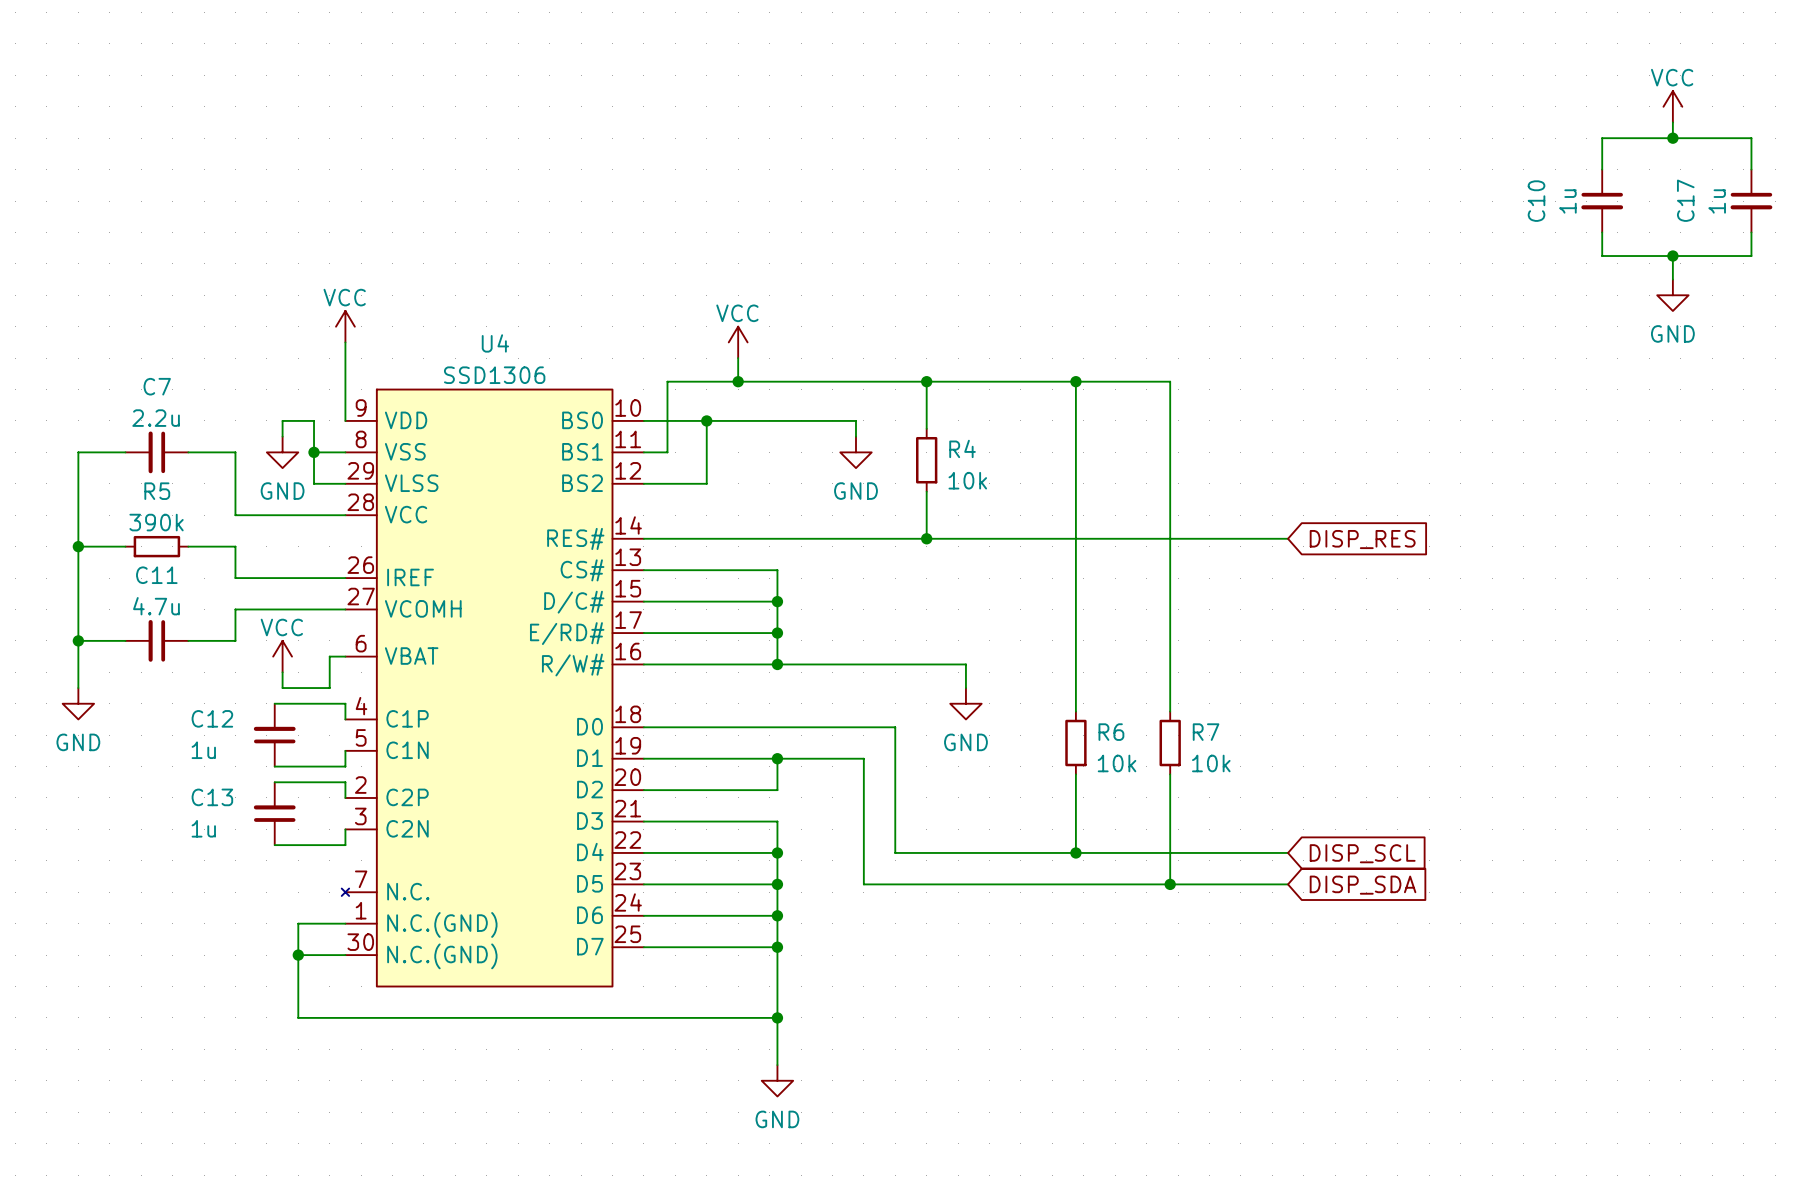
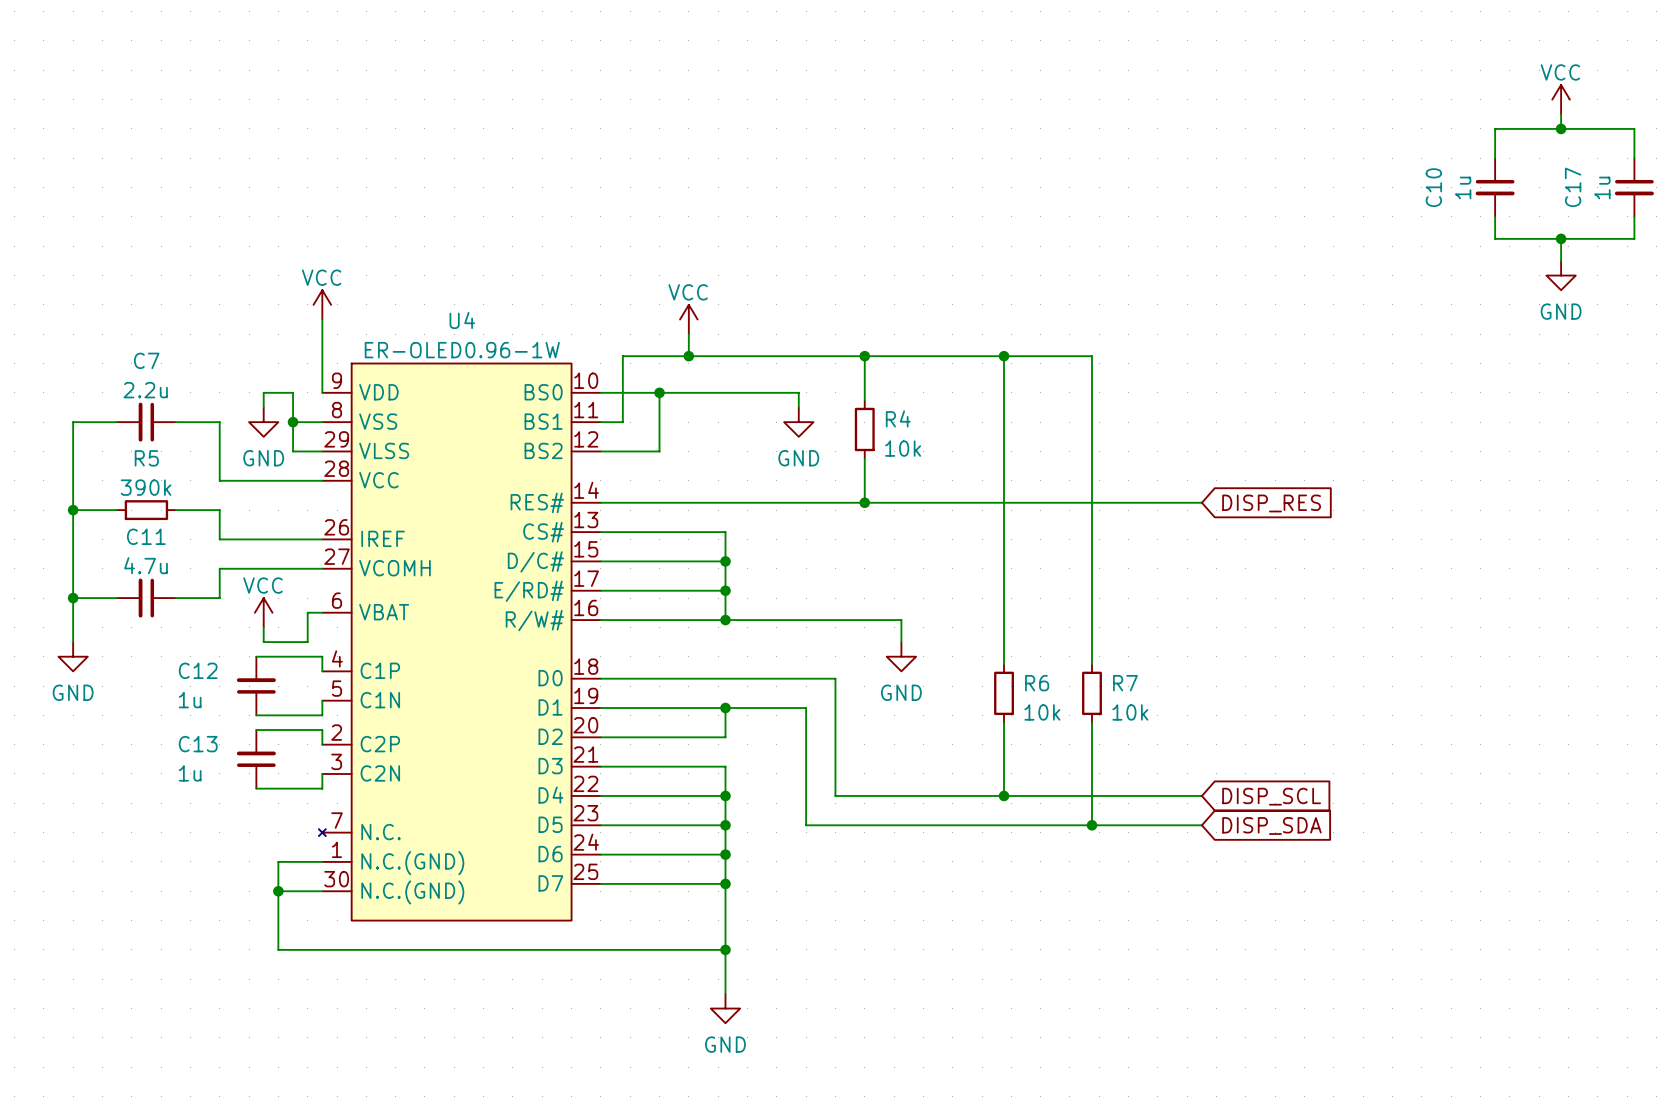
U4 value: SSD1306 (494, 375) -> ER-OLED0.96-1W (462, 350)

